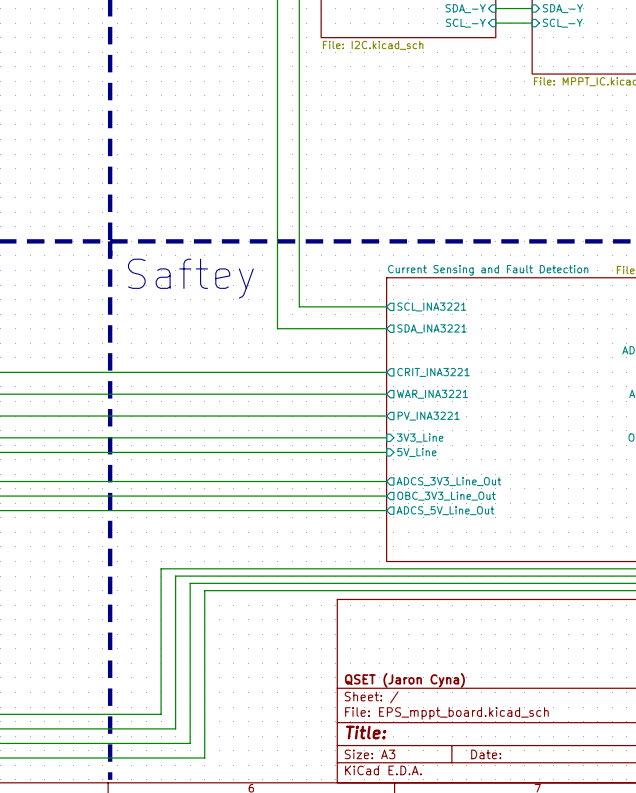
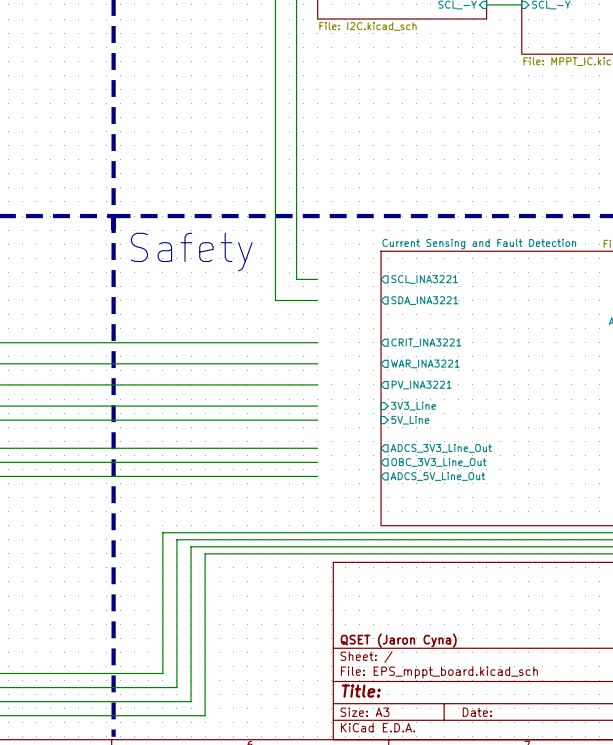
text: Saftey (190, 278) -> Safety (191, 252)
wire: (321, 306) (386, 306) -> none
wire: (321, 328) (386, 328) -> none
wire: (321, 372) (386, 372) -> none
wire: (321, 394) (386, 394) -> none
wire: (321, 416) (386, 416) -> none
wire: (321, 437) (386, 437) -> none
wire: (321, 452) (386, 452) -> none
wire: (321, 481) (386, 481) -> none
wire: (321, 496) (386, 496) -> none
wire: (321, 510) (386, 510) -> none

